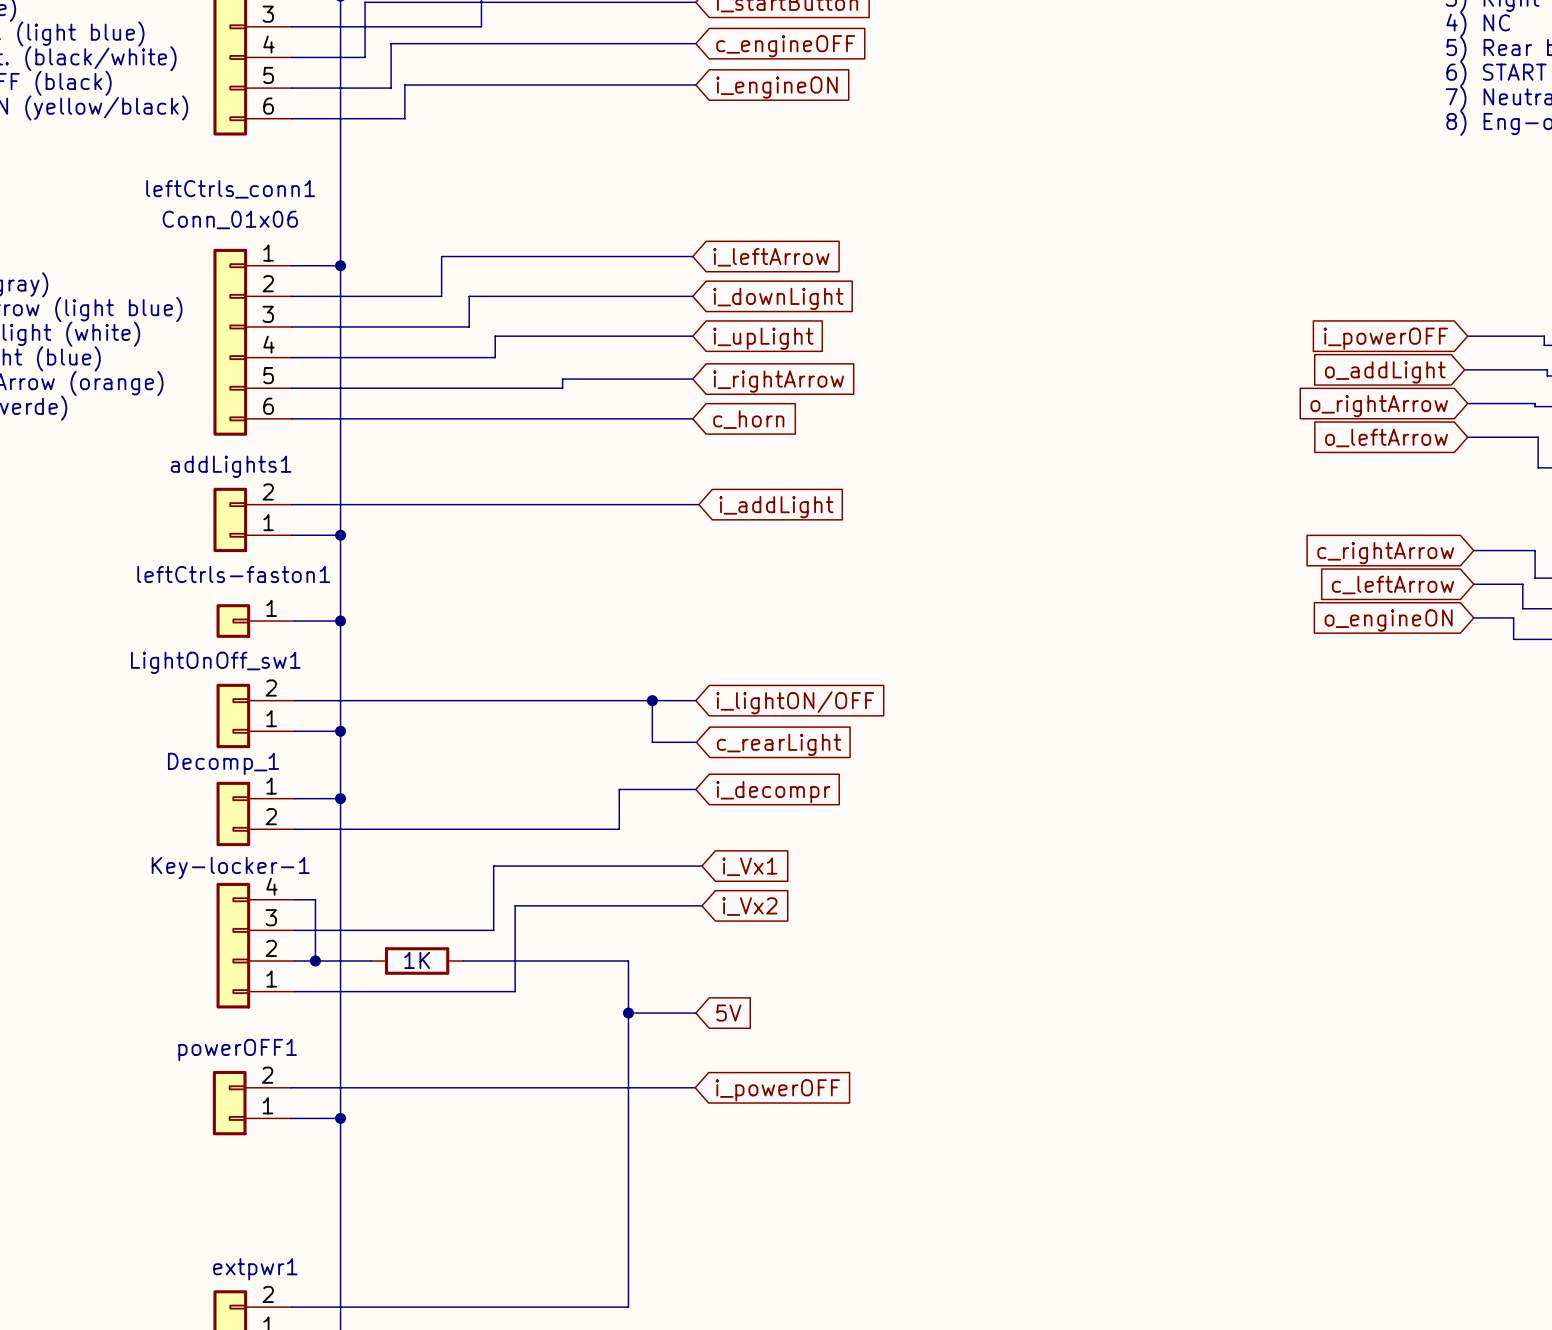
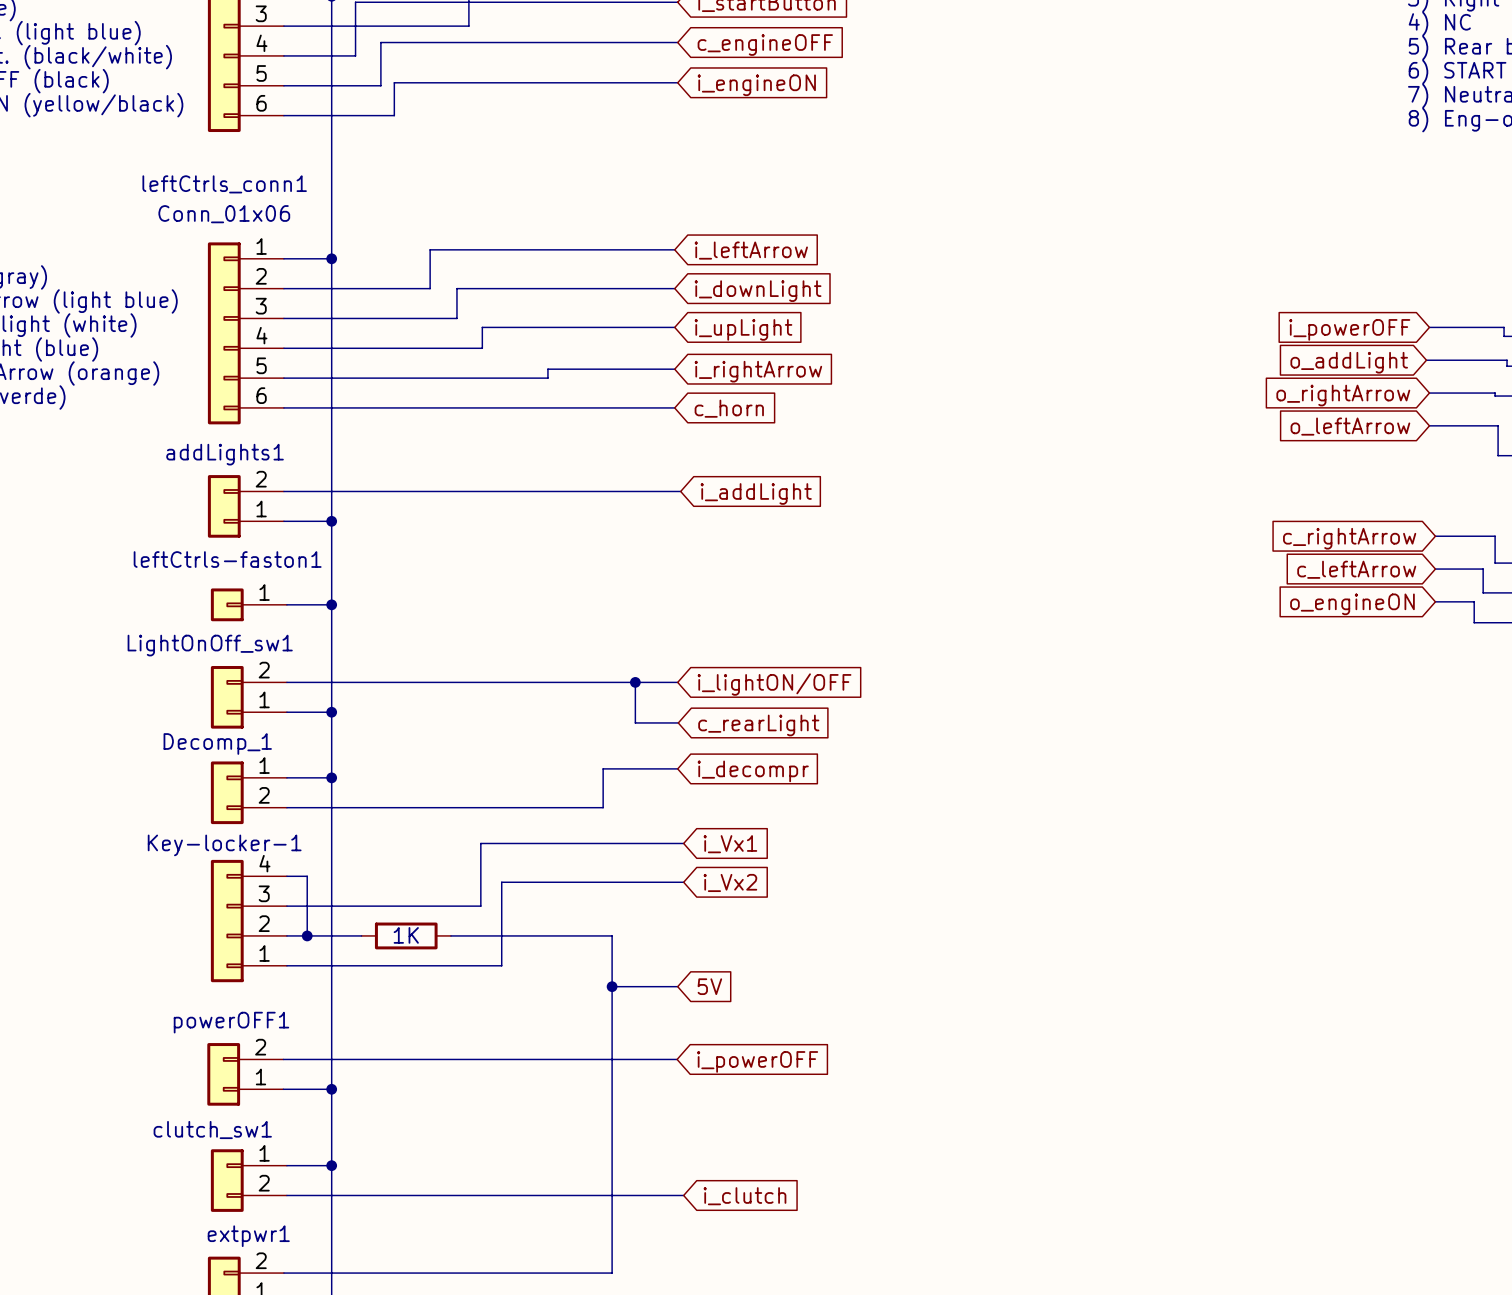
wire: none -> (286, 1165) (331, 1165)
junction: none -> (331, 1165)
clutch_sw1: none -> (248, 1180)
wire: none -> (286, 1195) (683, 1195)
global label: none -> i_clutch (744, 1196)

